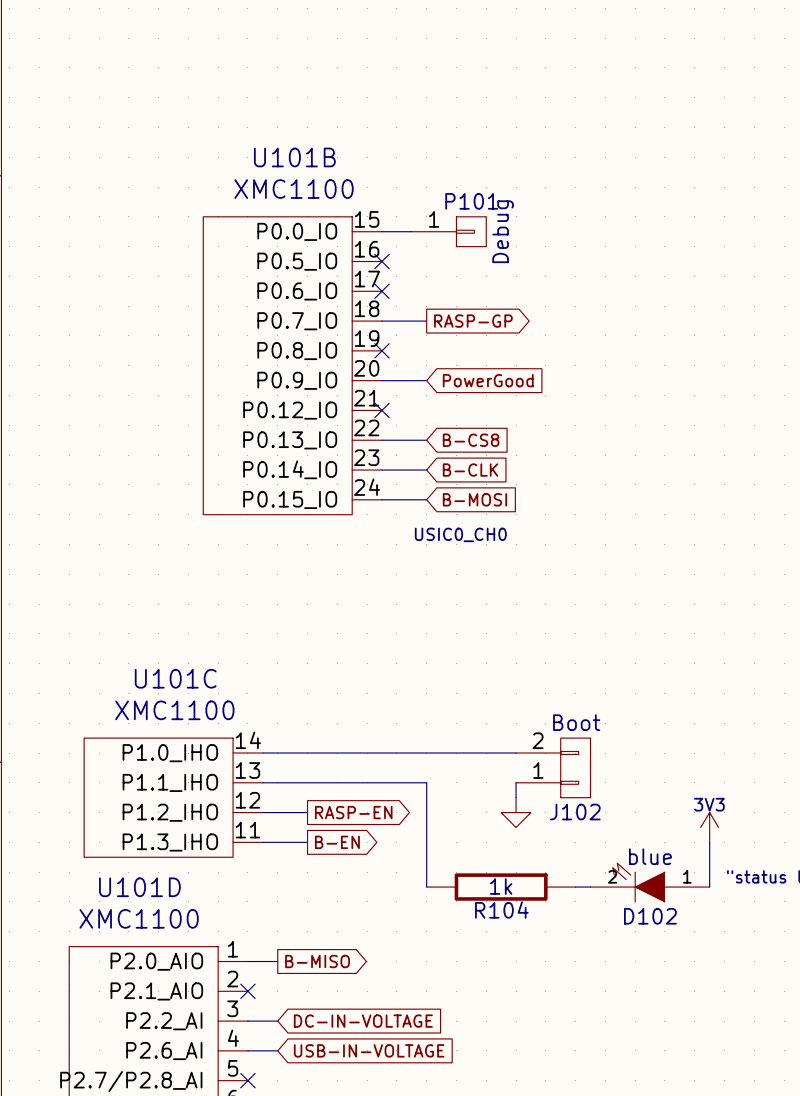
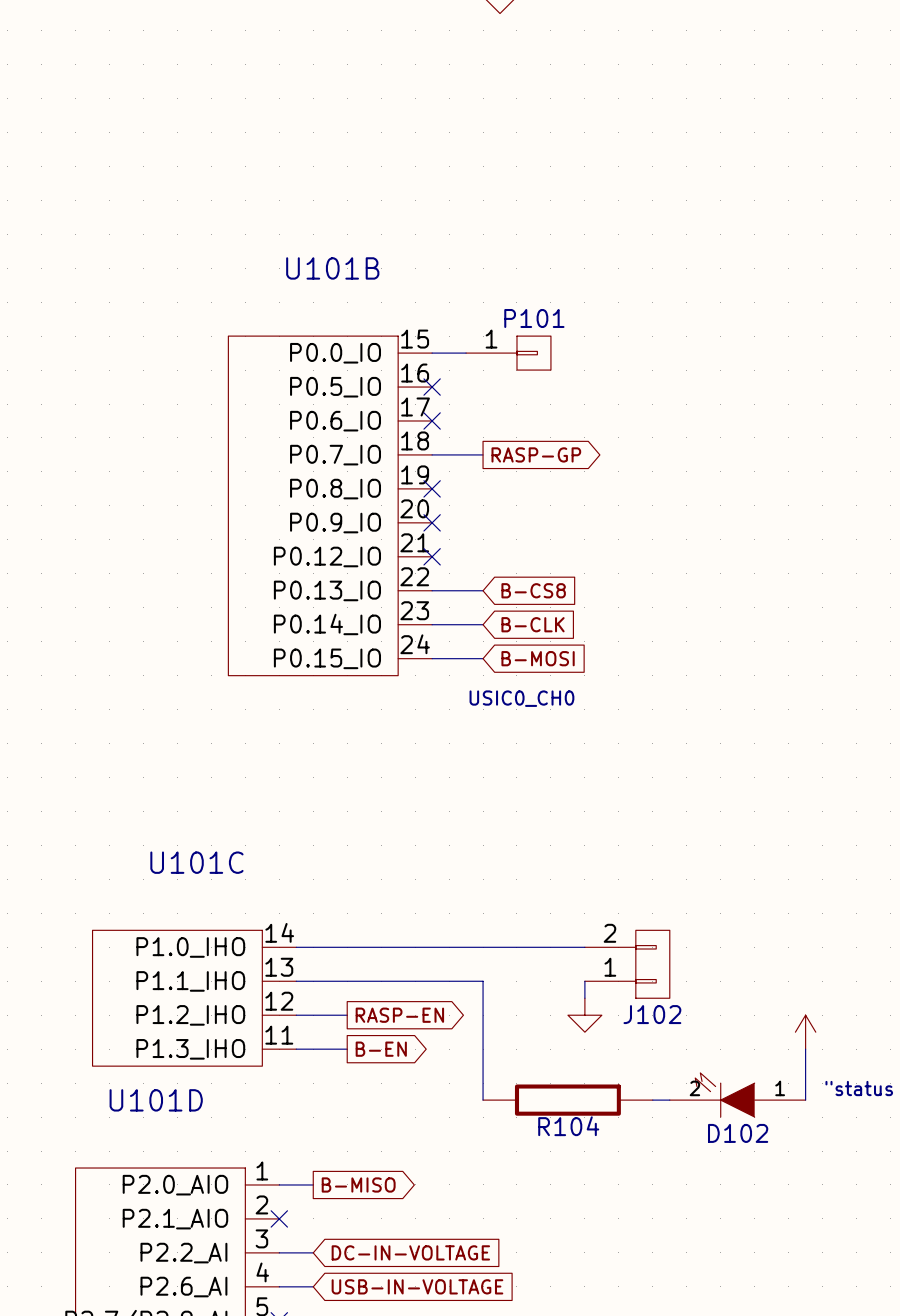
U101B value: XMC1100 (293, 189) -> none
P101 value: Debug (503, 231) -> none
wire: (381, 380) (426, 380) -> none
no-connect mark: none -> (432, 522)
global label: PowerGood (488, 380) -> none
U101C value: XMC1100 (174, 710) -> none
J102 value: Boot (576, 722) -> none
power symbol text: 3V3 (709, 804) -> none
D102 value: blue (650, 856) -> none
R104 value: 1k (501, 886) -> none
U101D value: XMC1100 (139, 918) -> none

